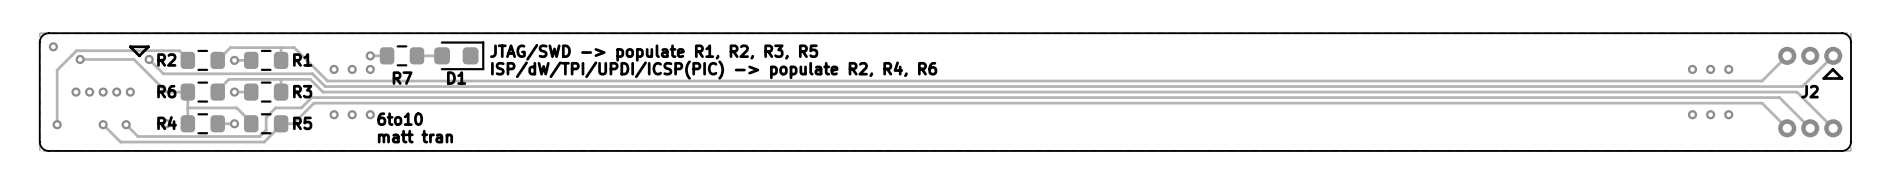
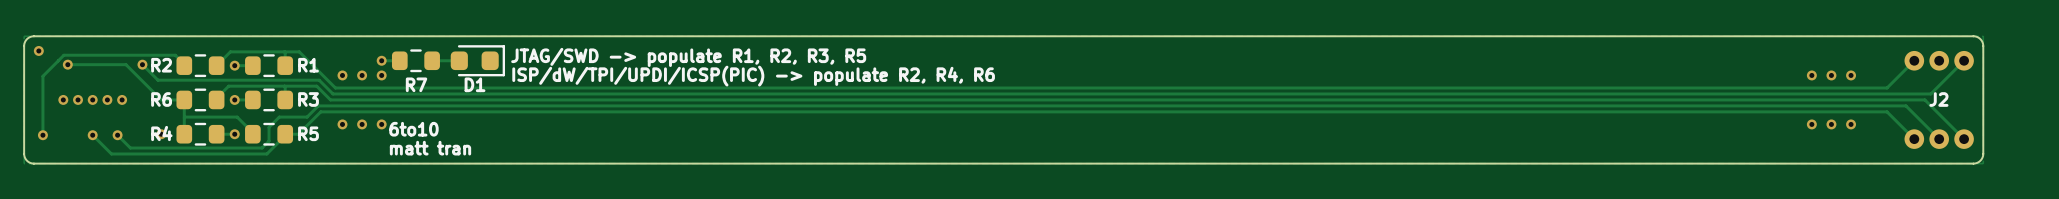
line: (130, 46) (139, 55) (148, 46) (130, 46) -> none
line: (1832, 69) (1823, 78) (1841, 78) (1832, 69) -> none

